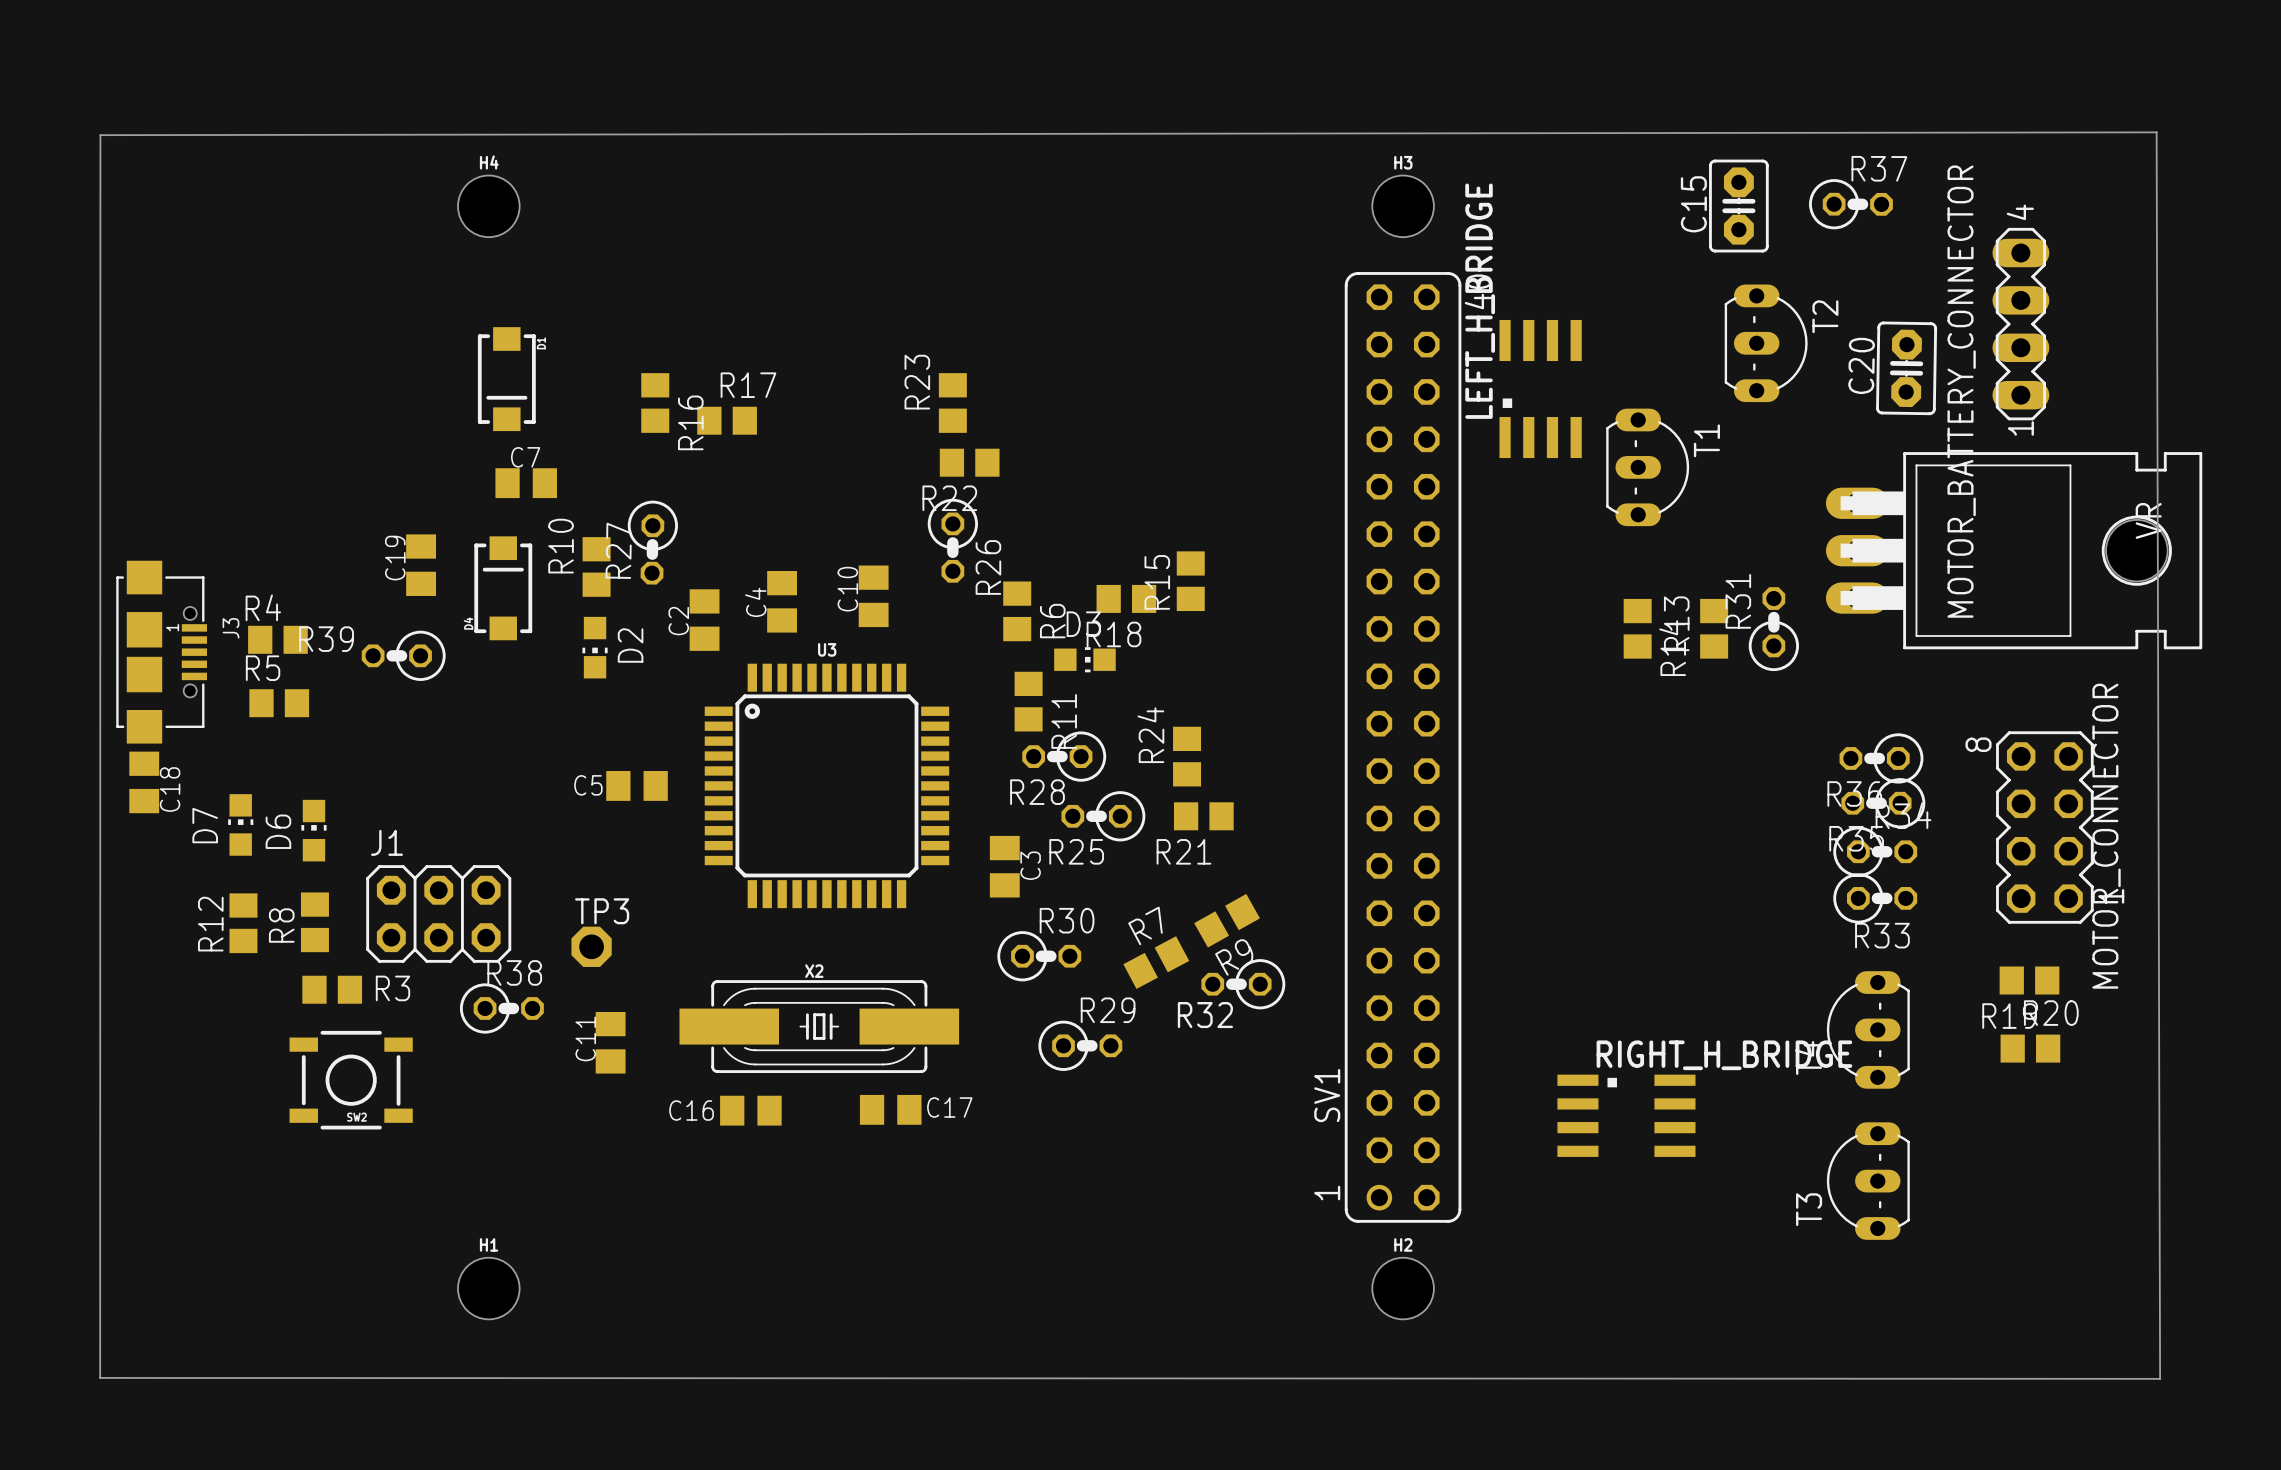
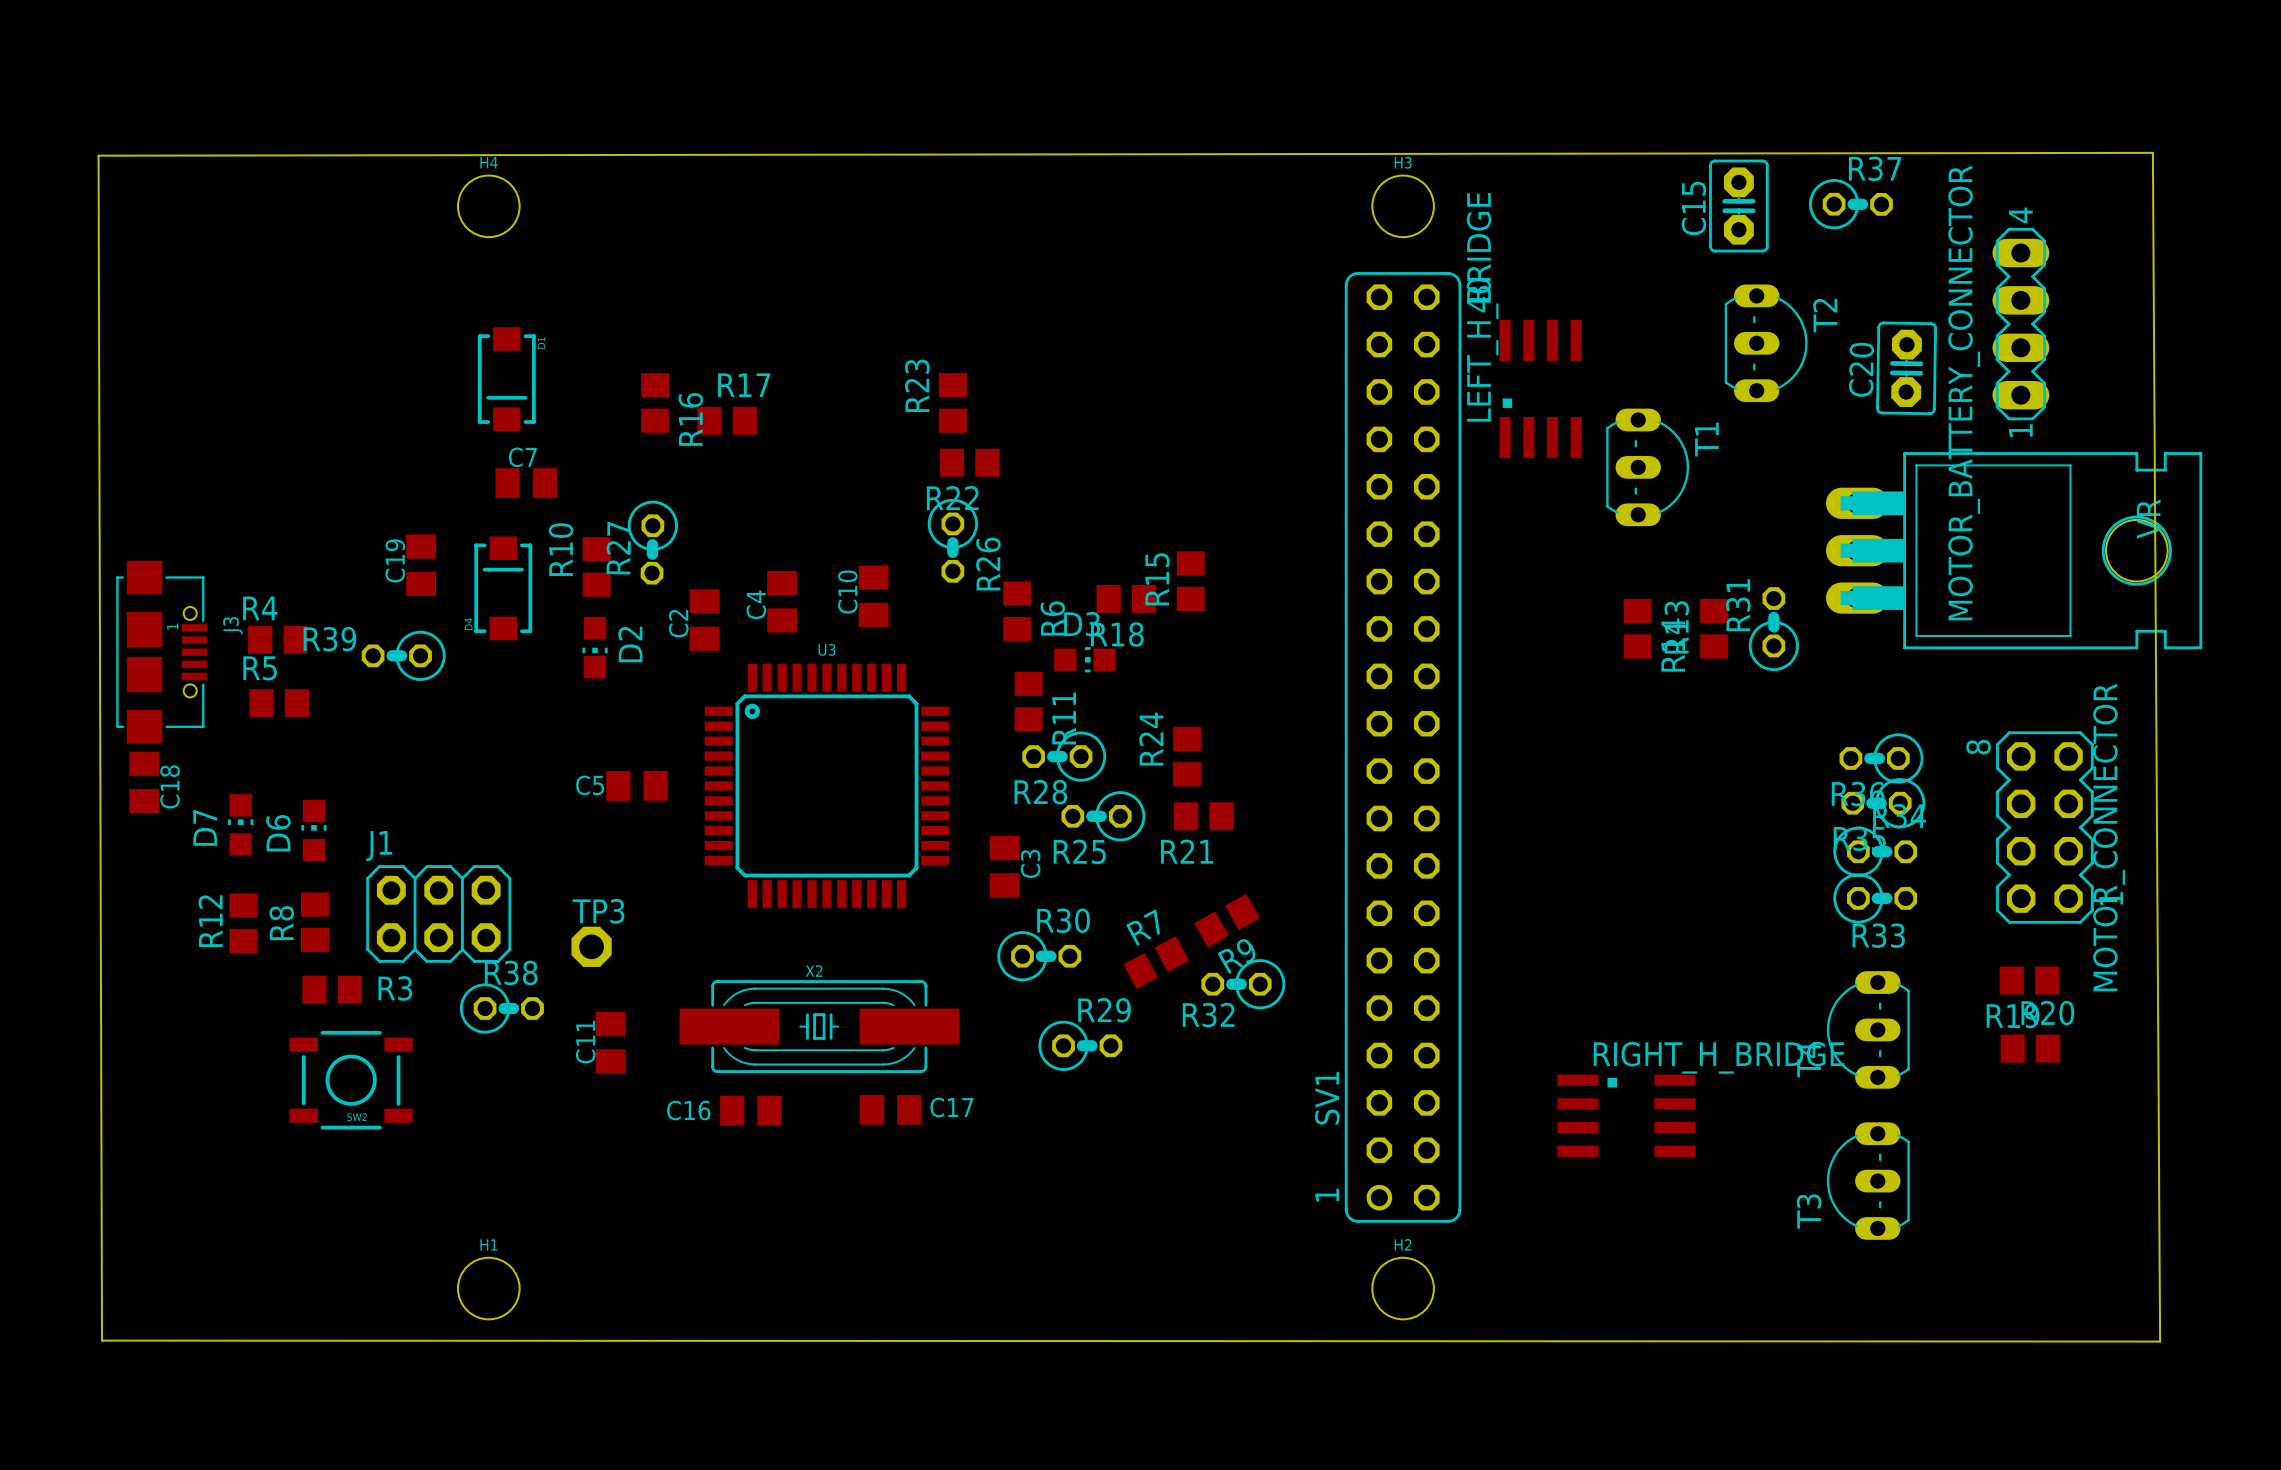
board edge: (2156, 132) (2160, 1378) (100, 1377) (100, 135) (2156, 132) -> (2152, 152) (98, 155) (102, 1340) (2160, 1341) (2152, 152)

